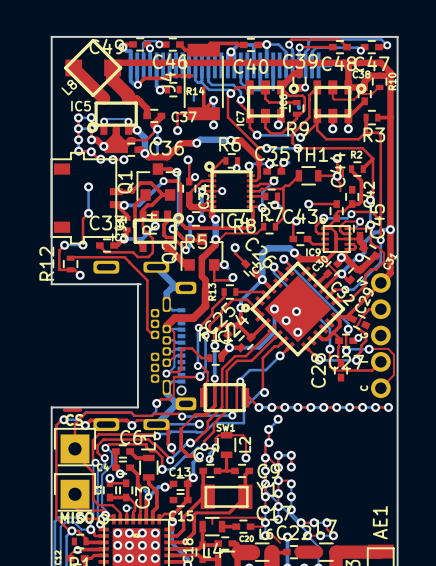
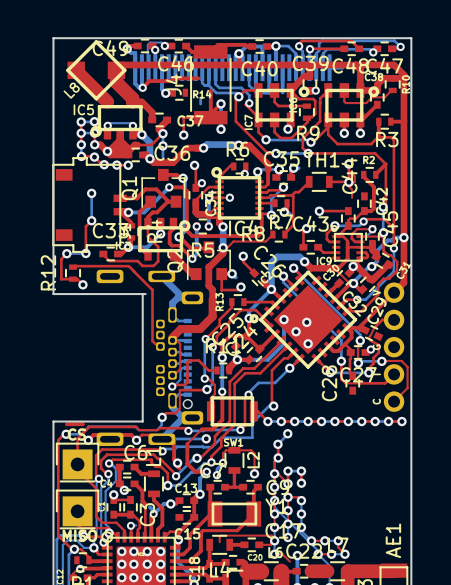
bottom track: (298, 106) (299, 108) -> none

